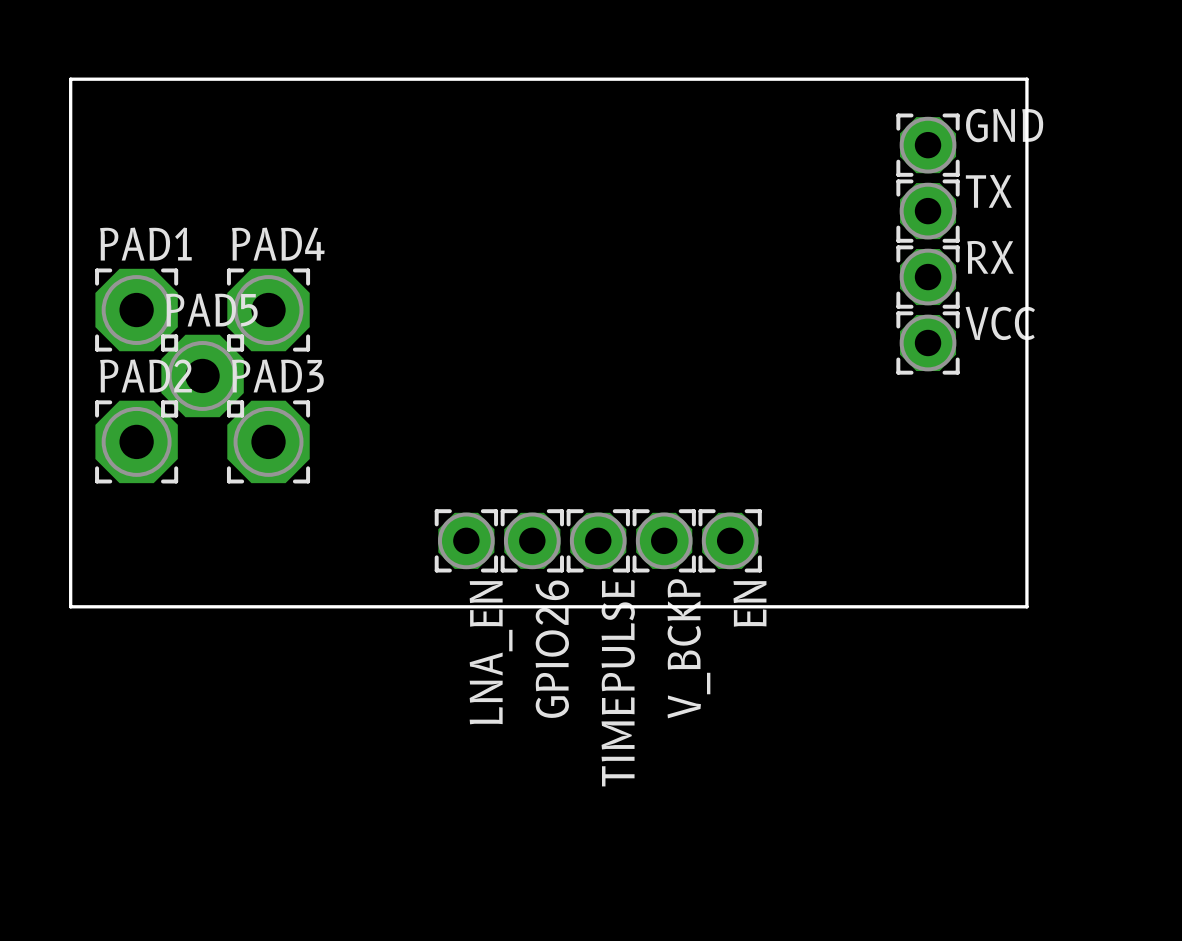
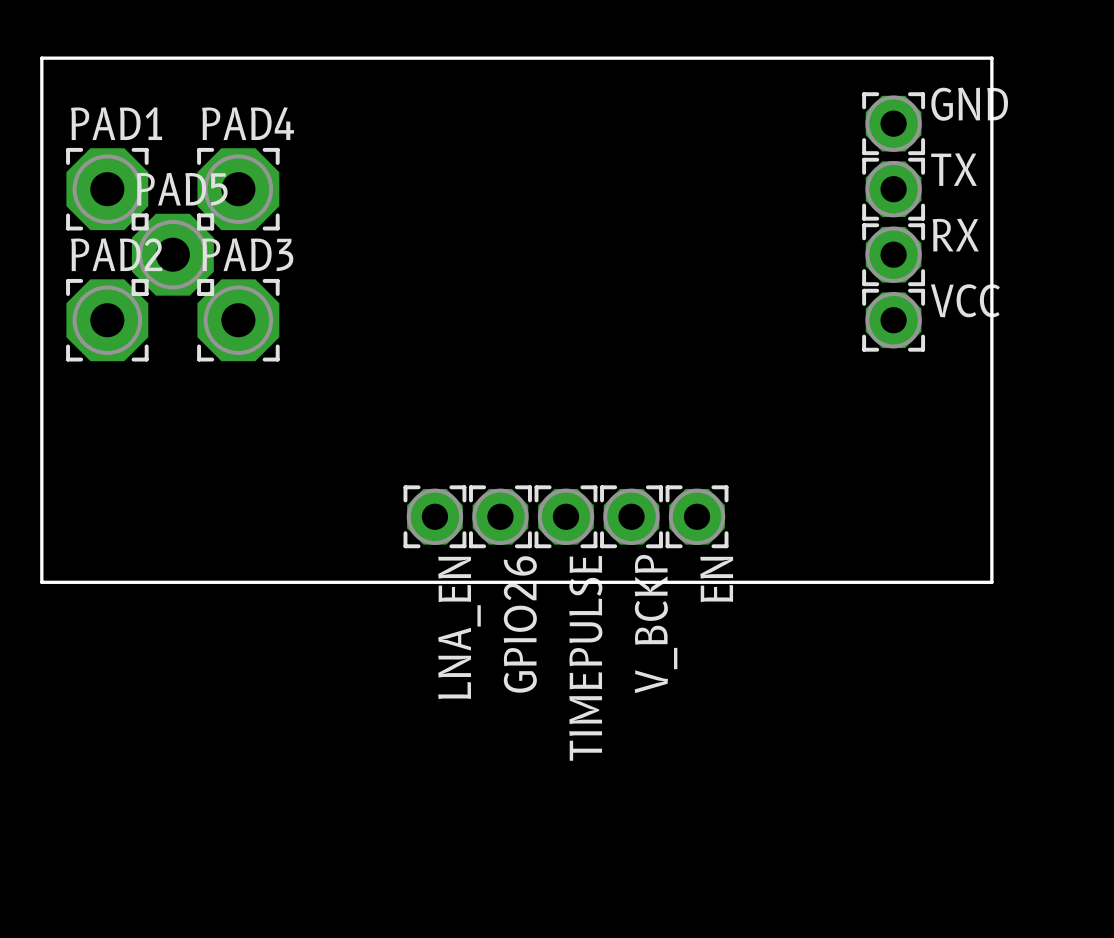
PAD1 position: (136, 310) -> (107, 189)
PAD4 position: (268, 310) -> (238, 189)
PAD5 position: (202, 375) -> (172, 254)
PAD2 position: (136, 441) -> (107, 320)
PAD3 position: (268, 441) -> (238, 320)

